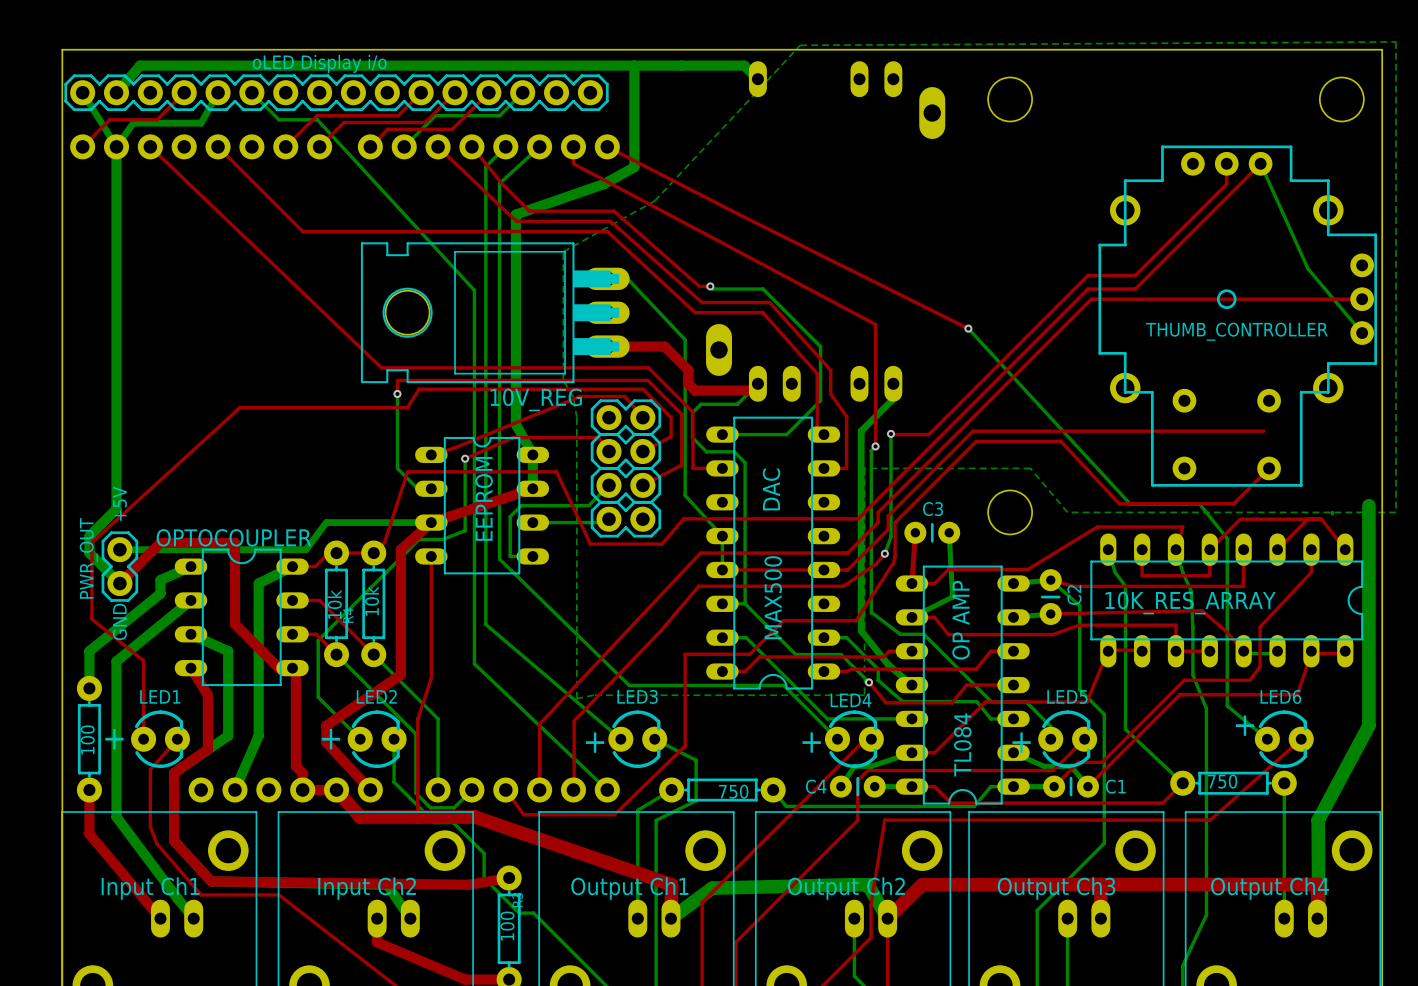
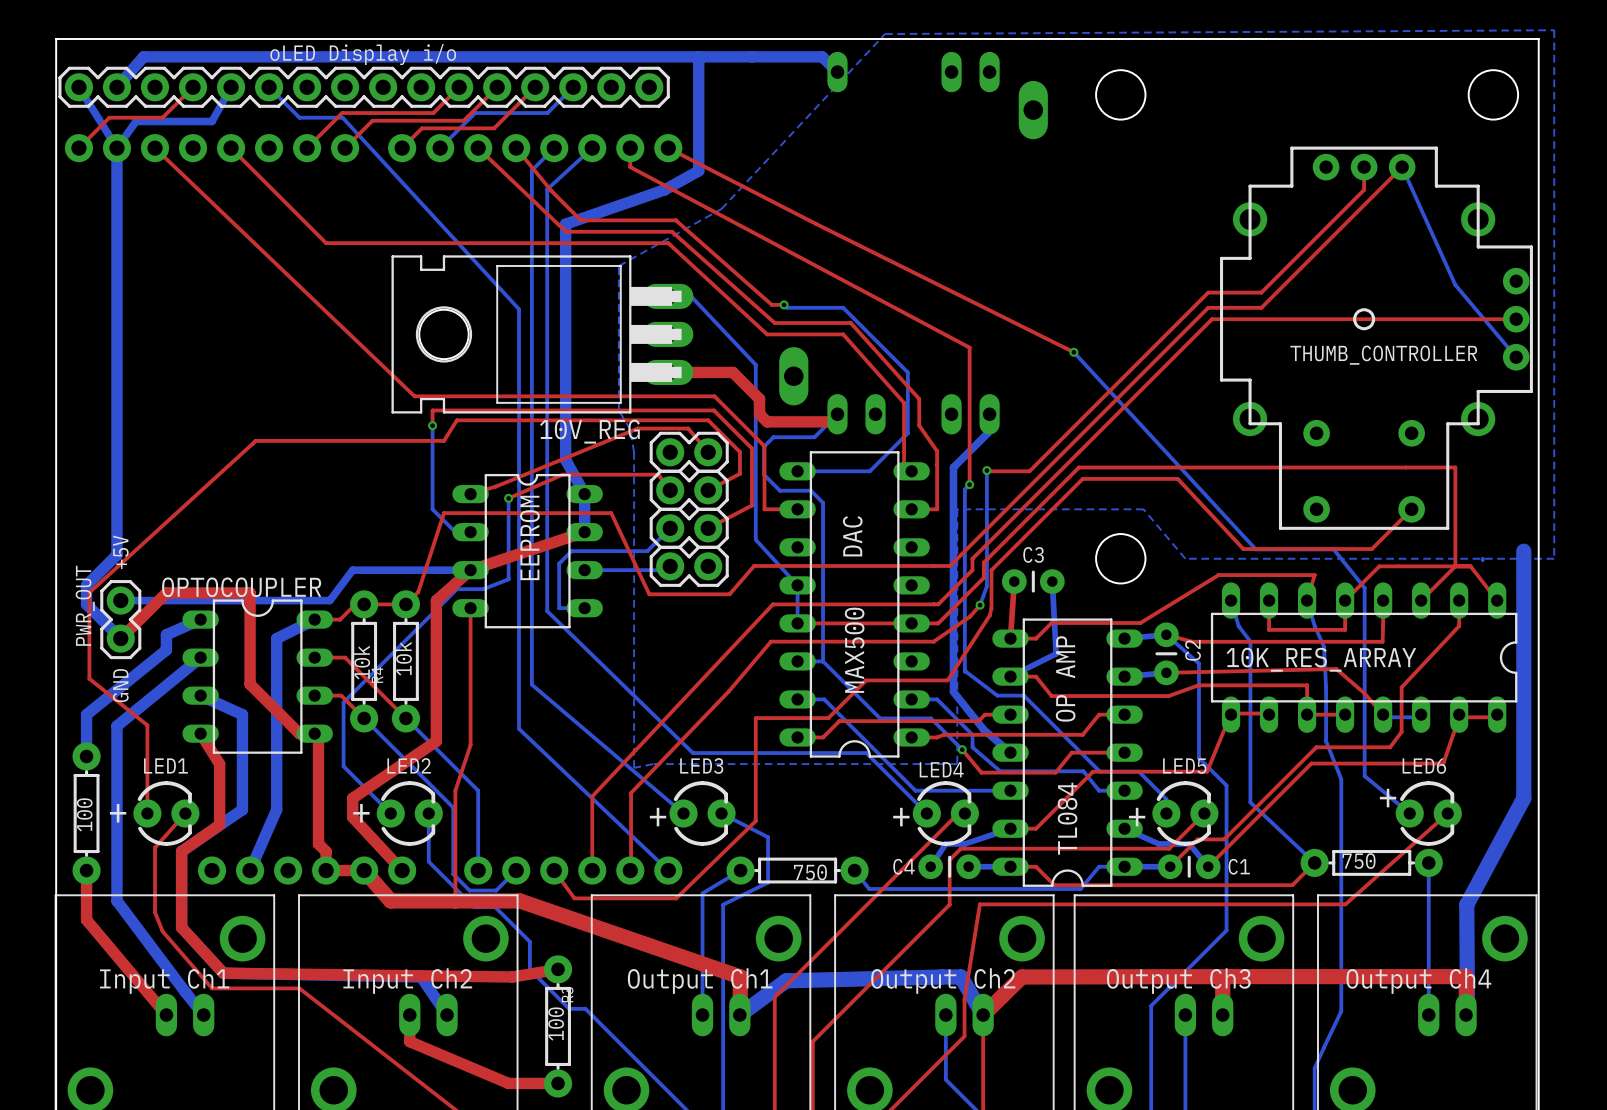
top track: none -> (1405, 467) (1455, 467) (1455, 566)

